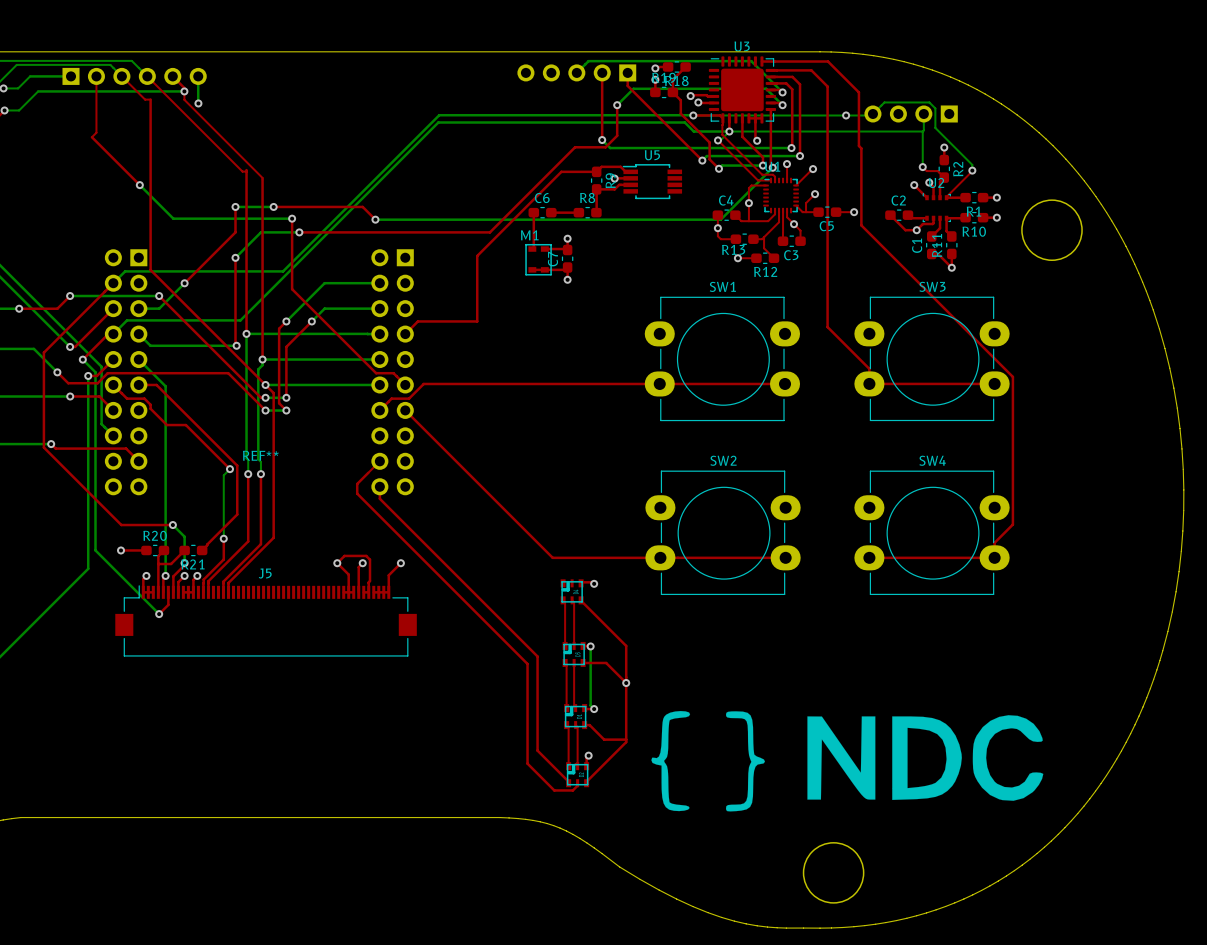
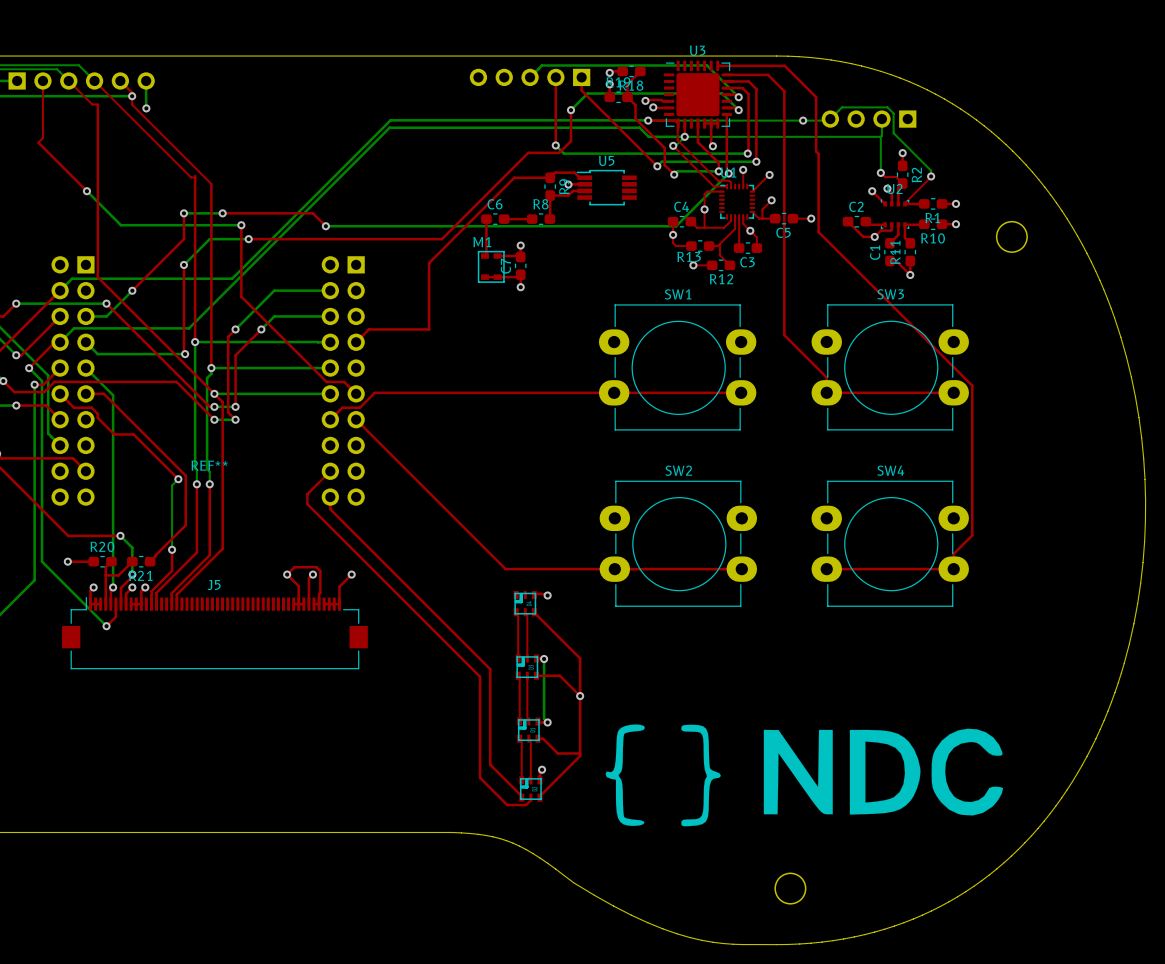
round board edge size: [1021, 199, 1083, 262] -> [995, 220, 1028, 253]
round board edge size: [802, 842, 865, 904] -> [774, 872, 807, 905]

